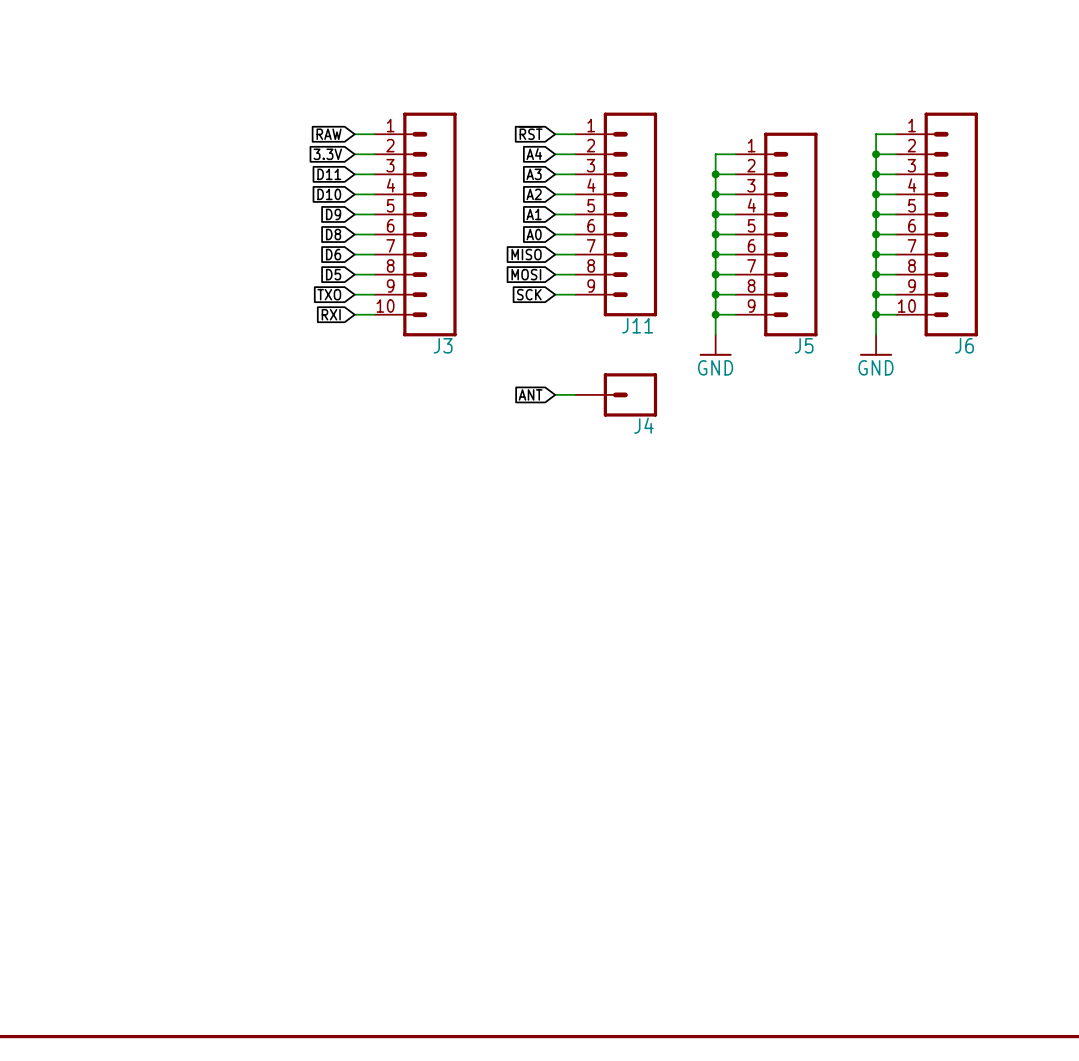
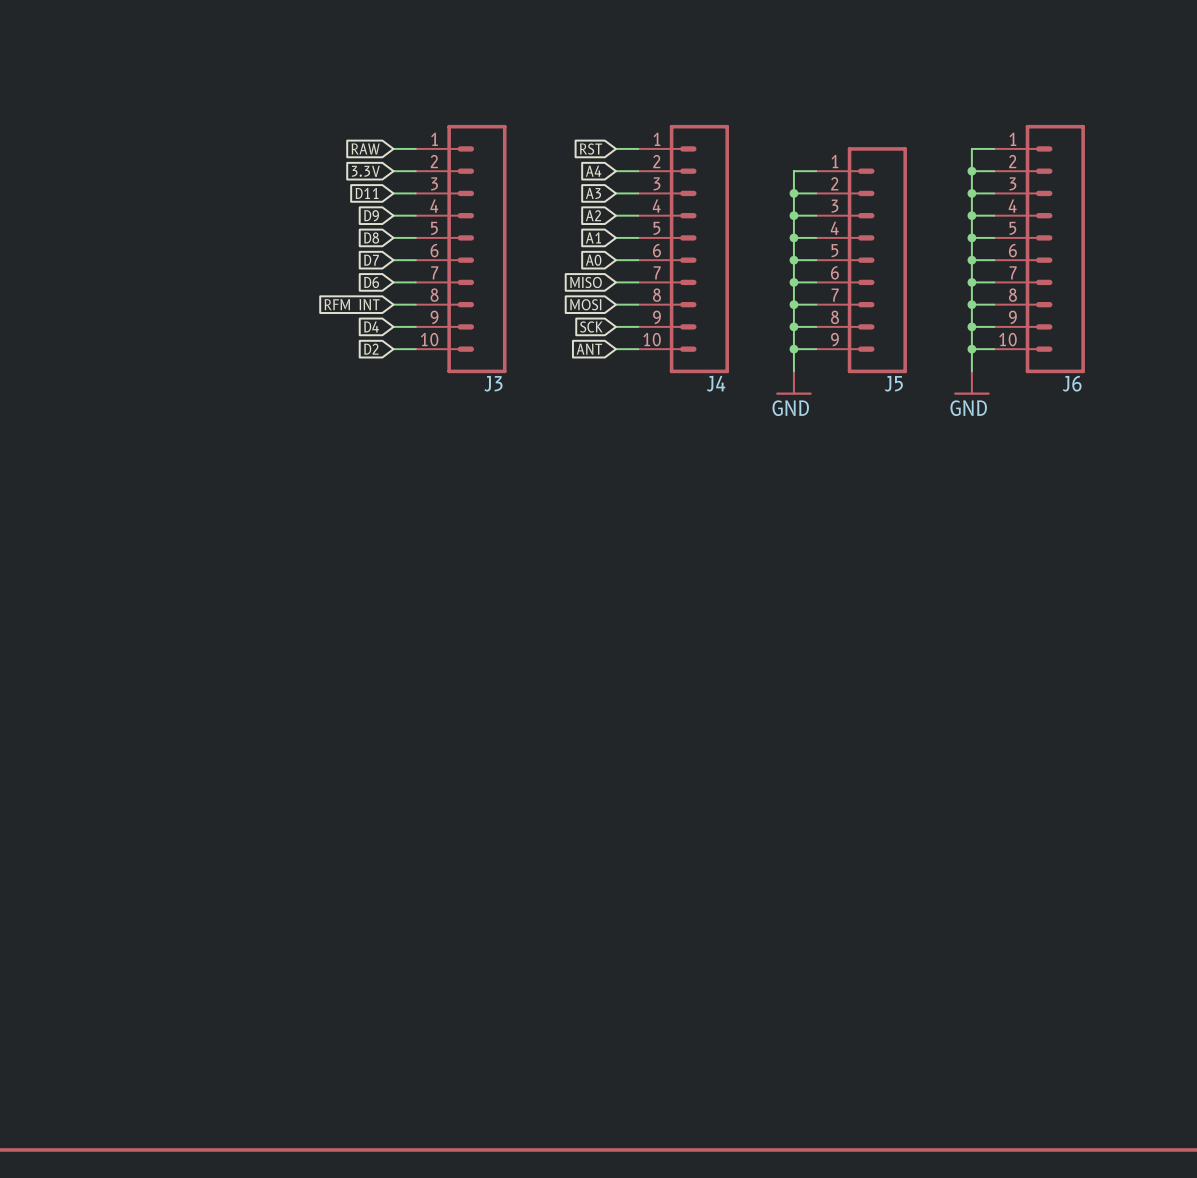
global label: ~{RST} (530, 133) -> RST (591, 149)
global label: D10 (329, 194) -> D9 (371, 215)
global label: D9 (333, 214) -> D8 (371, 237)
J11: (616, 214) -> none
global label: D8 (333, 234) -> D7 (371, 260)
global label: D5 (333, 274) -> RFM_INT (352, 306)
global label: TXO (329, 294) -> D4 (371, 326)
global label: RXI (331, 314) -> D2 (371, 349)
J4 symbol: [575, 373, 658, 417] -> [638, 124, 729, 374]
global label position: ANT (530, 394) -> ANT (589, 349)
wire: (555, 394) (575, 394) -> (615, 349) (638, 349)
J4 name position: J4 (643, 425) -> J4 (716, 383)

